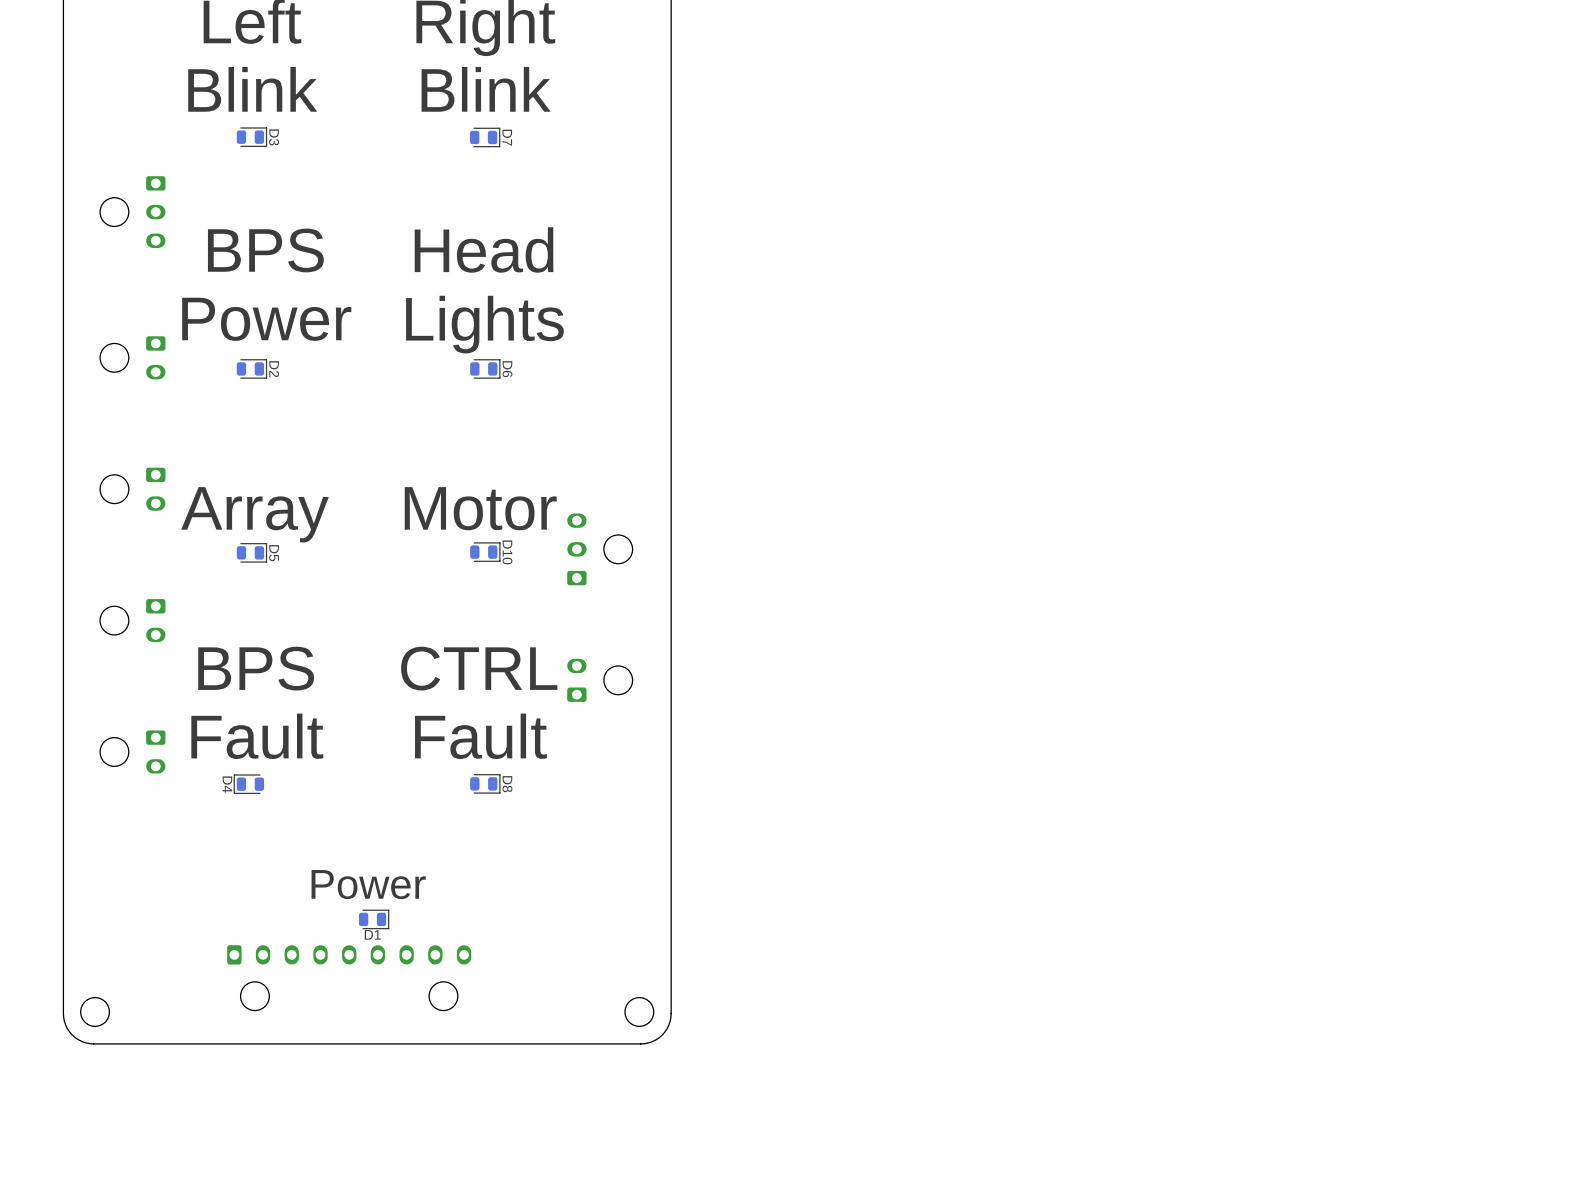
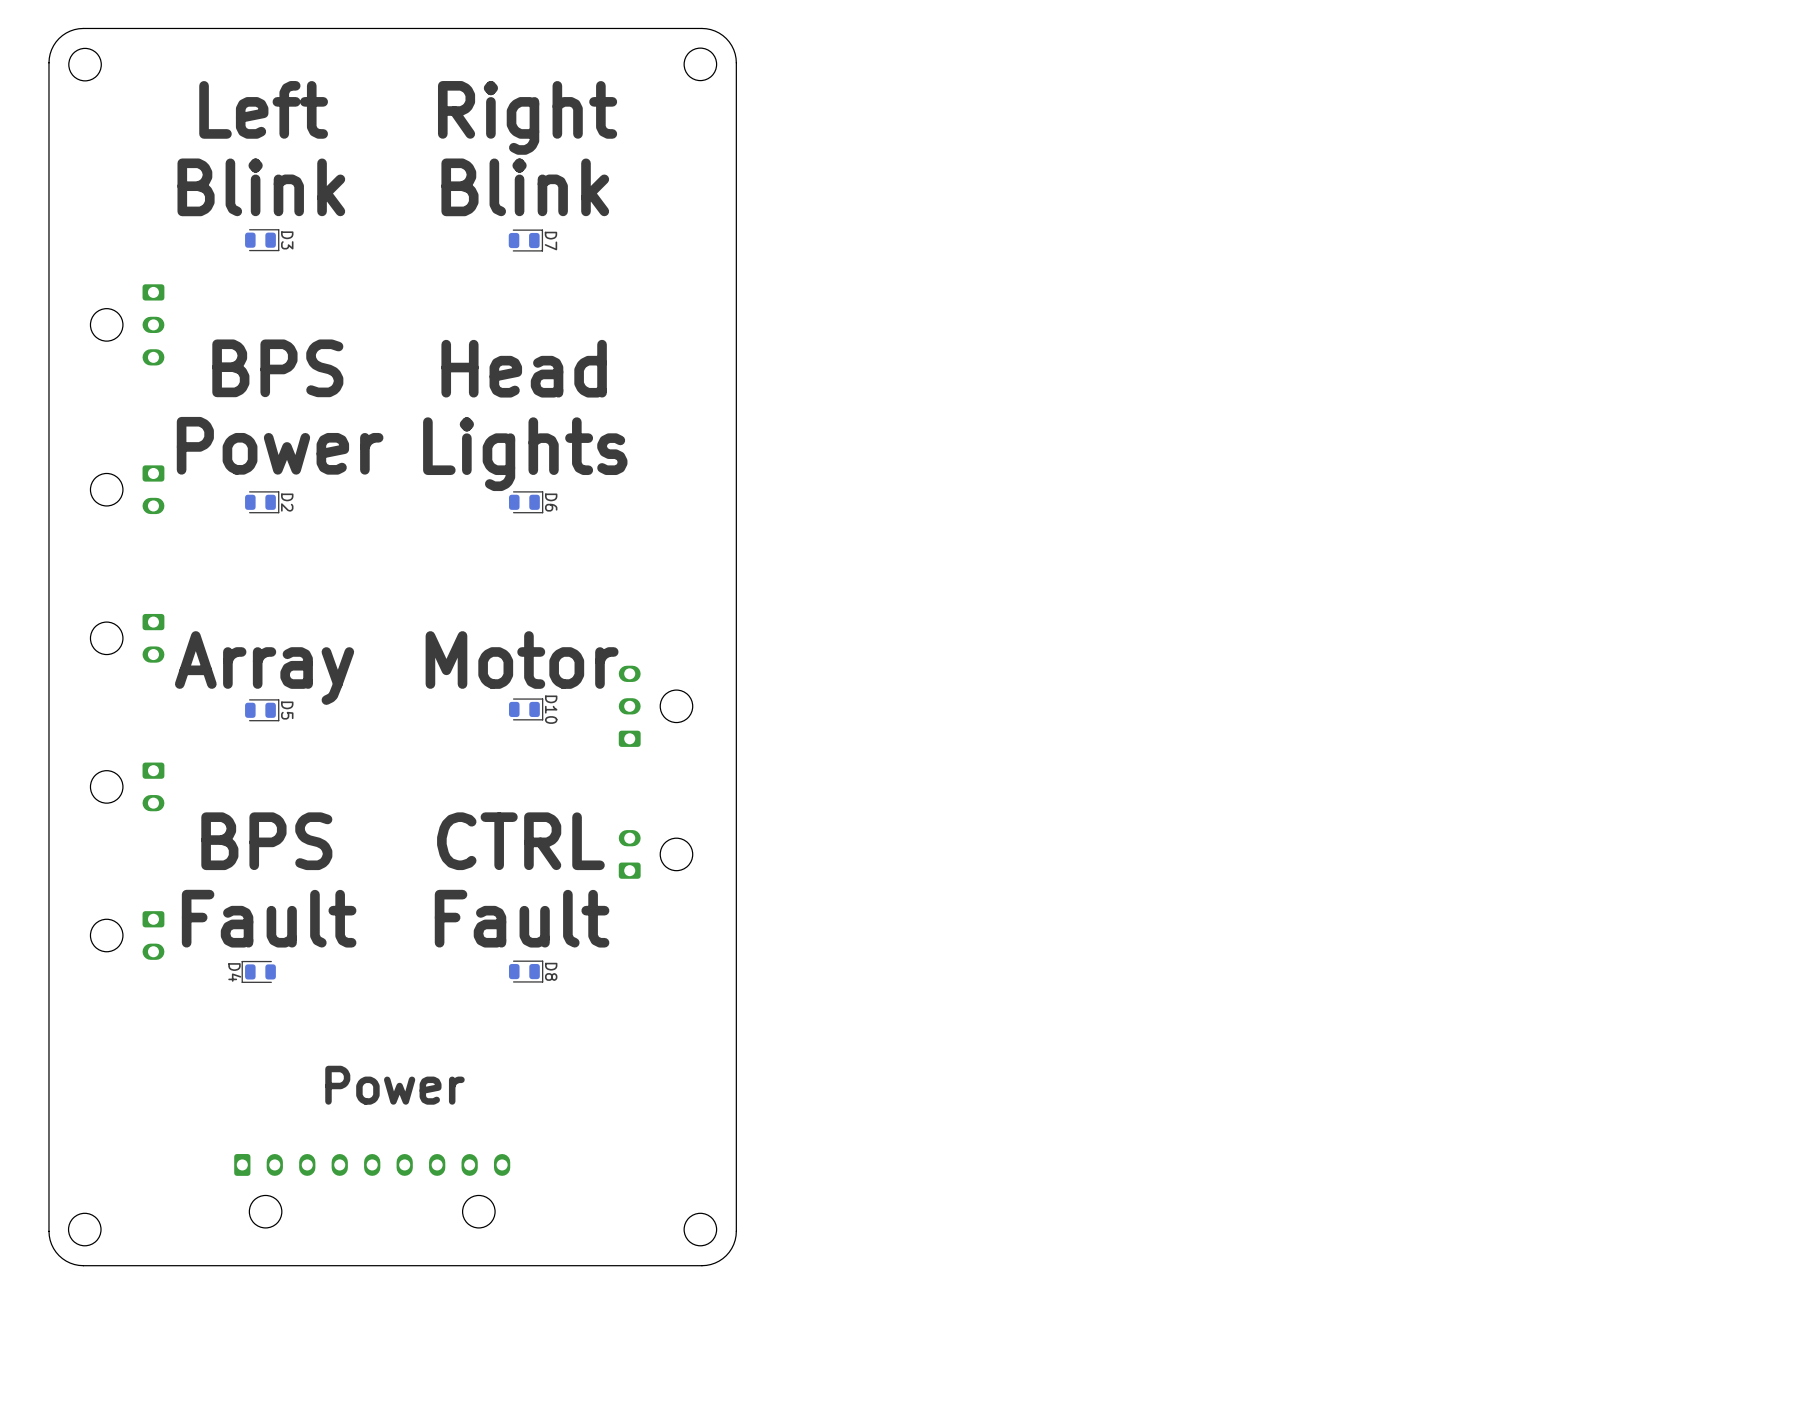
D1: (374, 919) -> none

